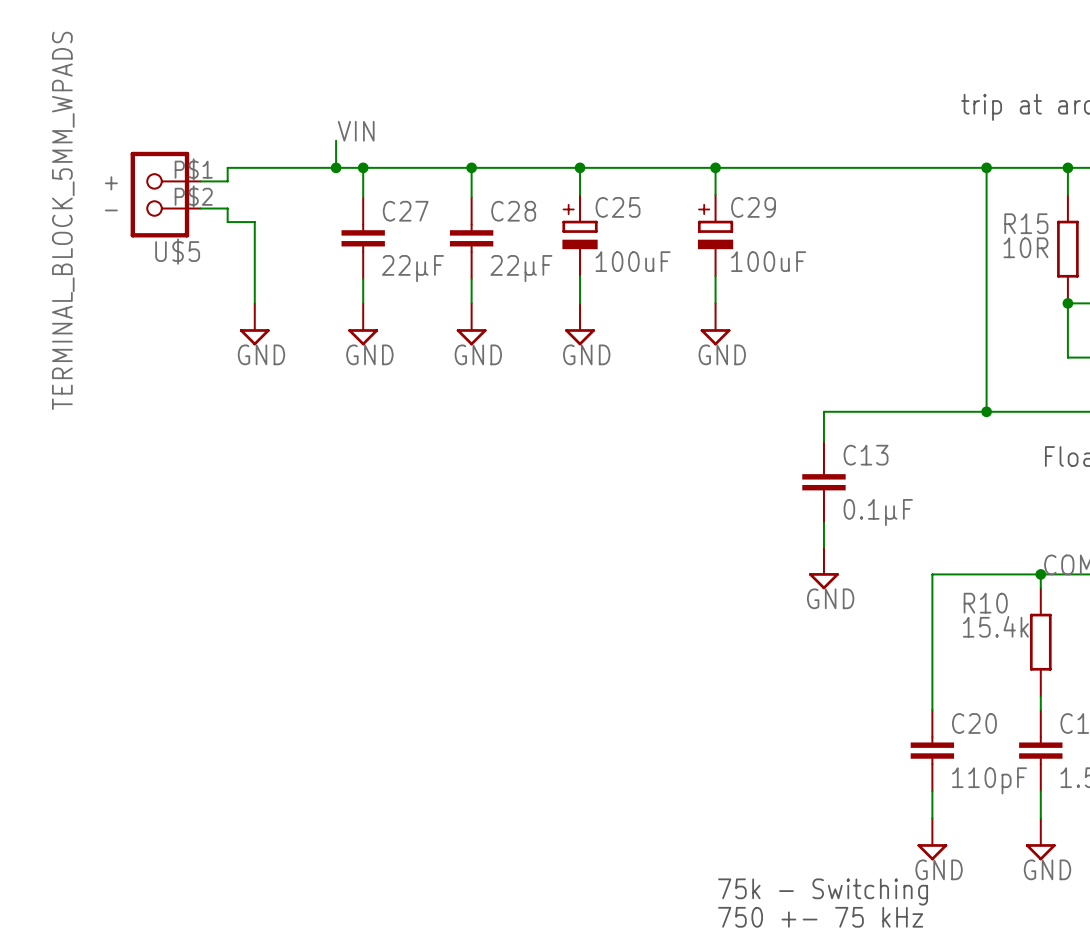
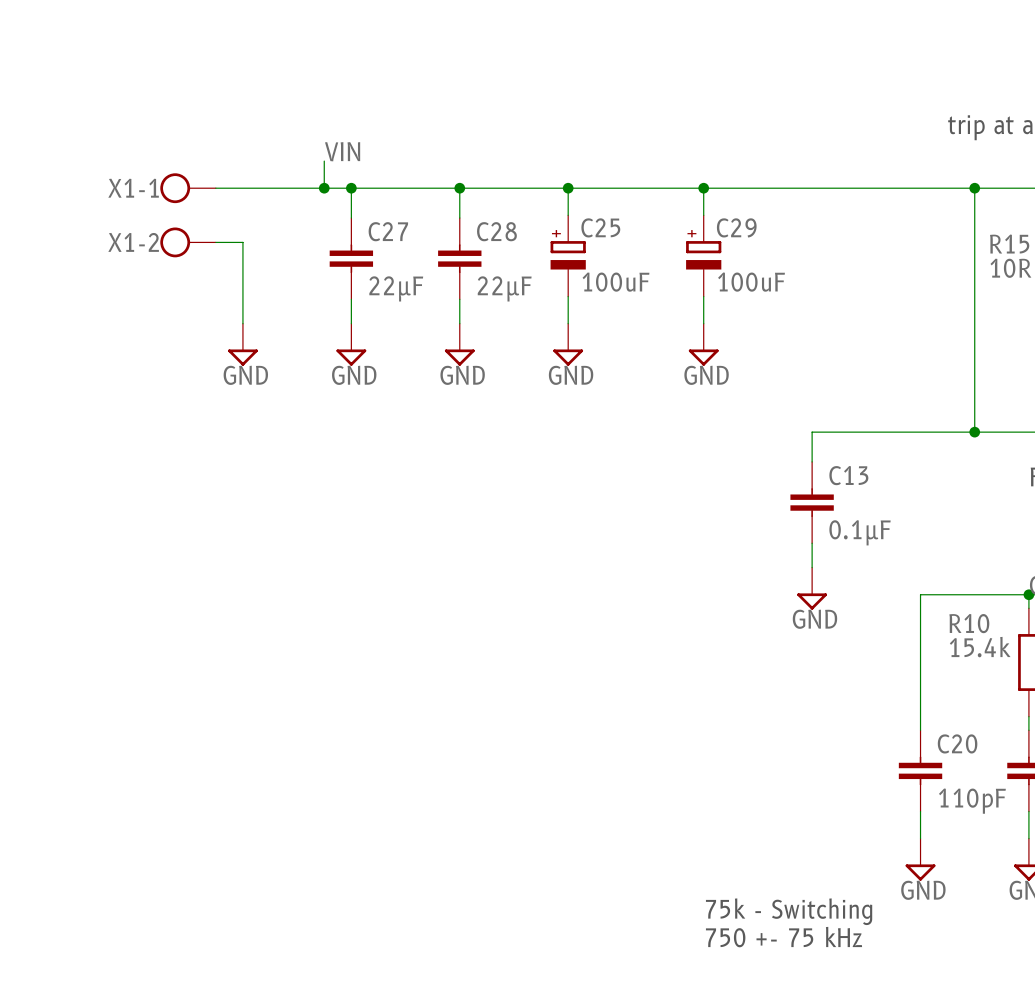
X1-1: none -> (188, 188)
wire: (227, 167) (227, 181) (200, 181) -> none
U$5: TERMINAL_BLOCK_5MM_WPADS (165, 194) -> none
wire: (200, 208) (227, 208) (227, 222) -> none
X1-2: none -> (188, 242)

